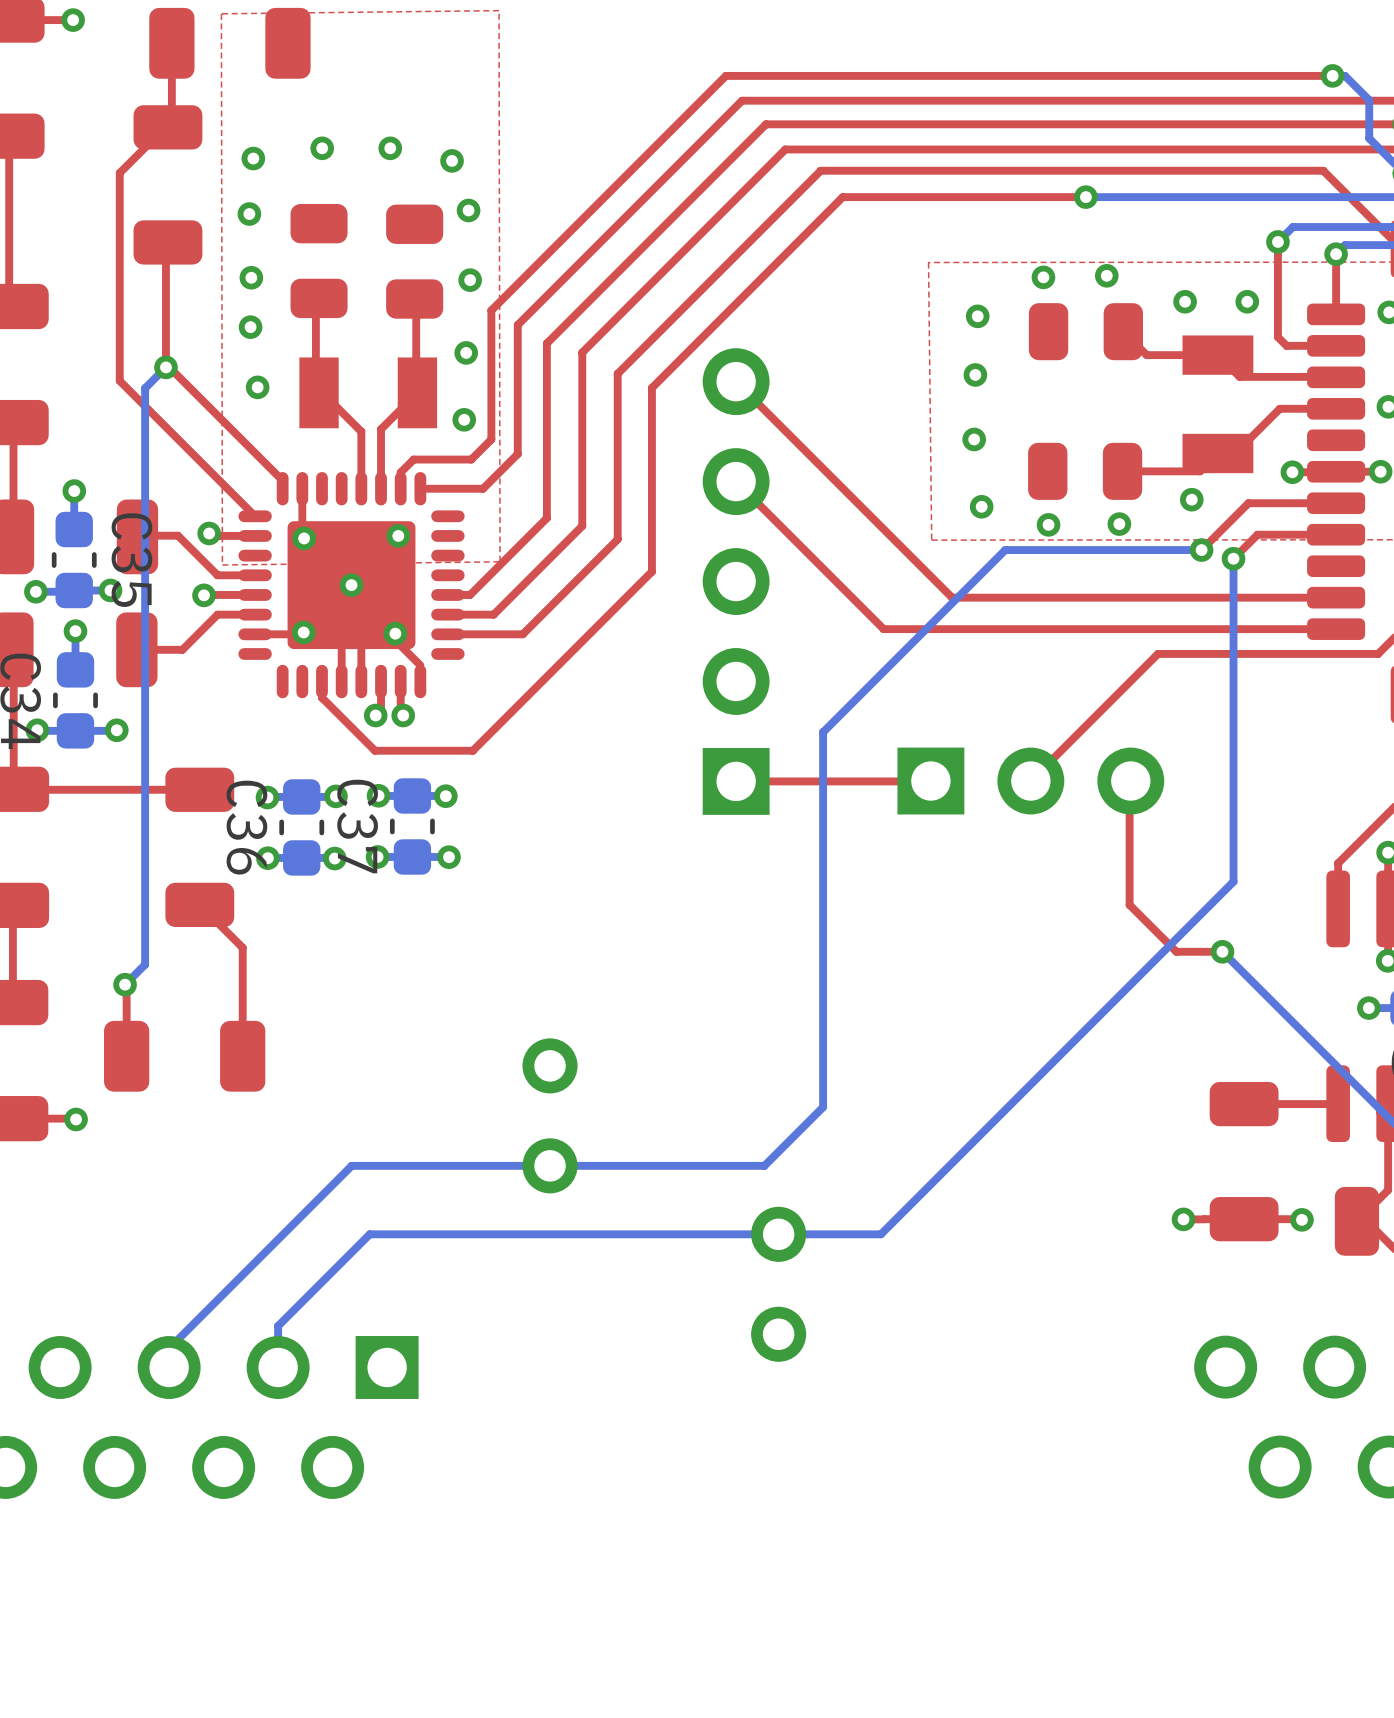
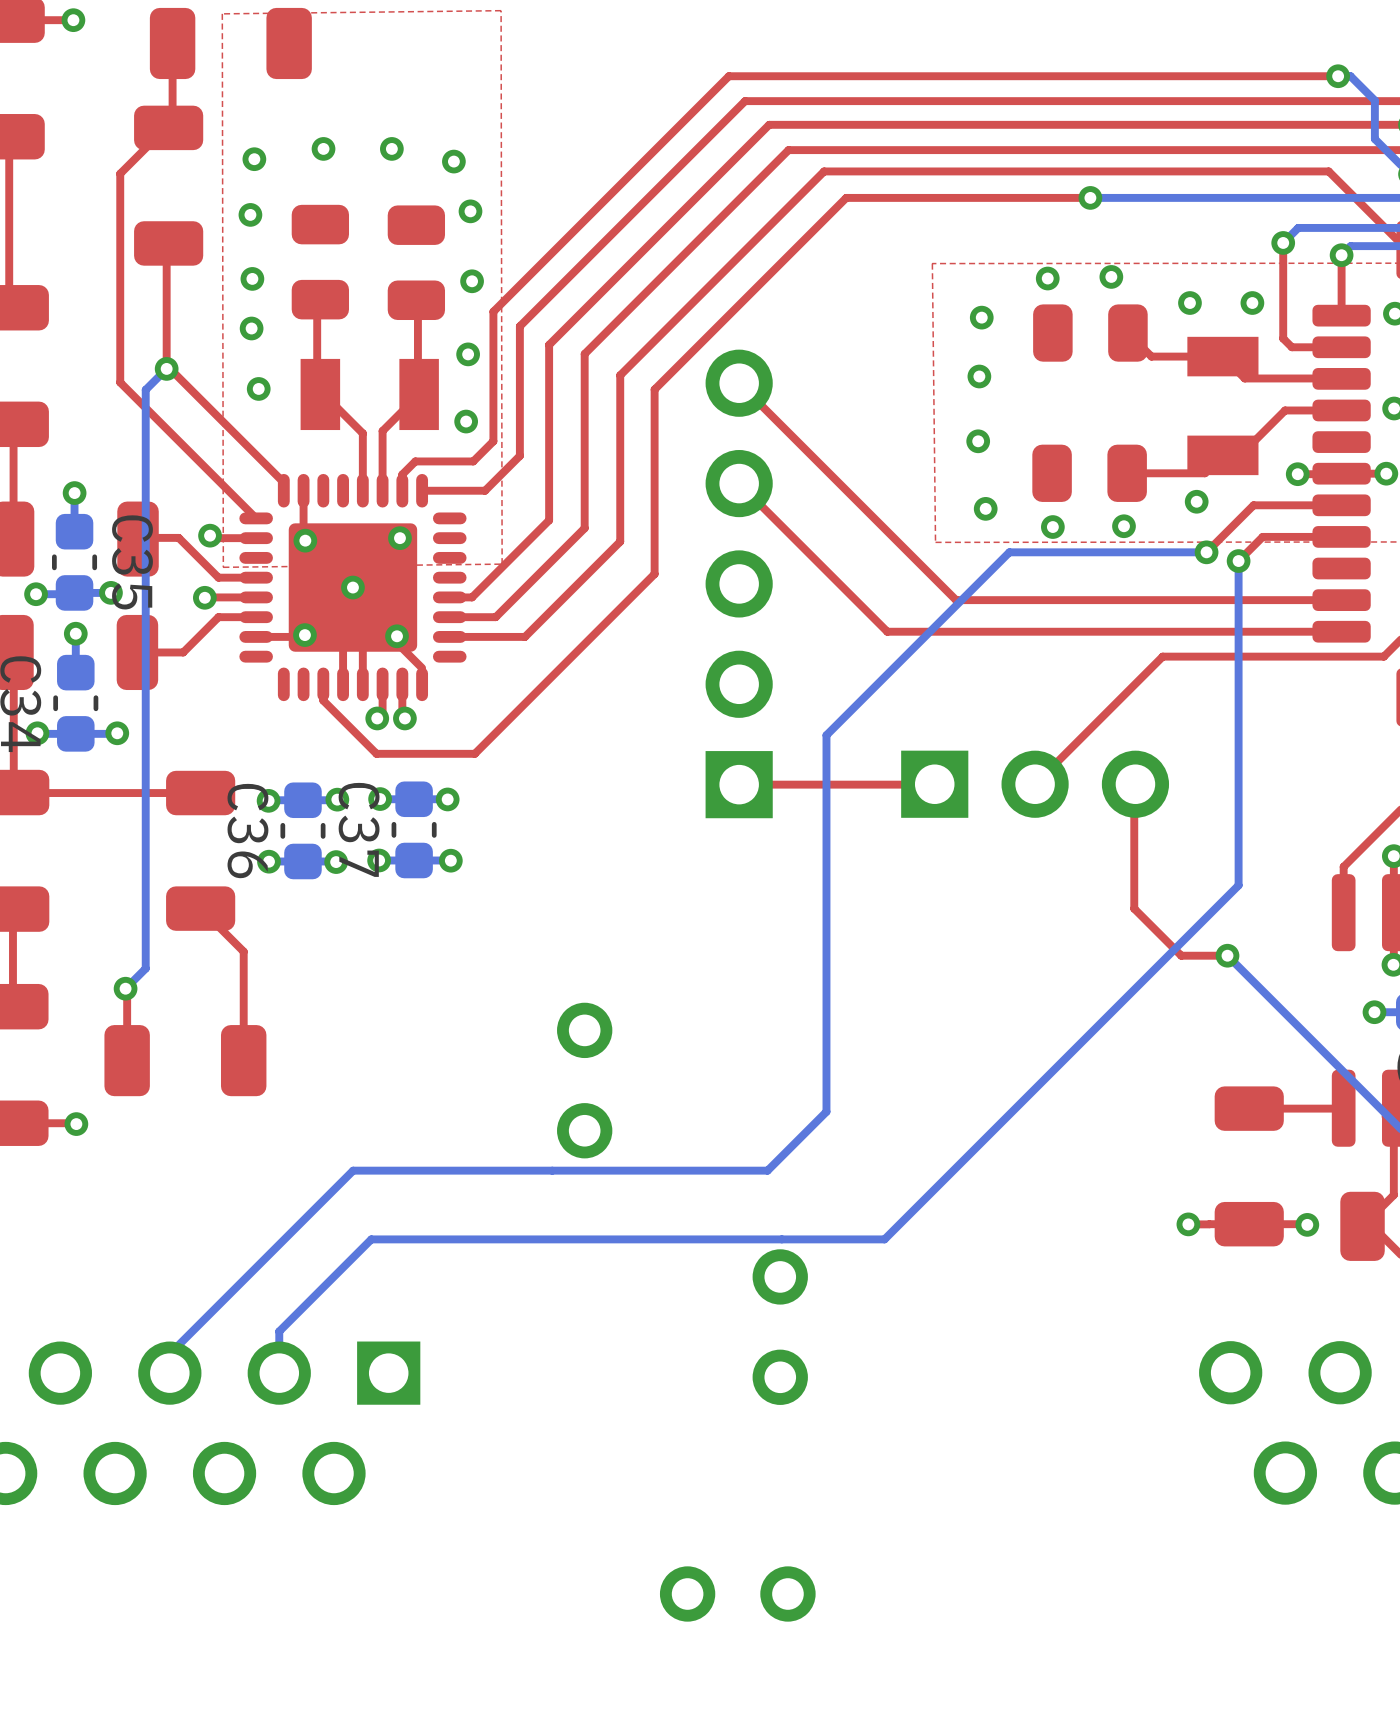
part position: (550, 1115) -> (584, 1080)
part position: (778, 1284) -> (780, 1327)
part: none -> (737, 1594)

